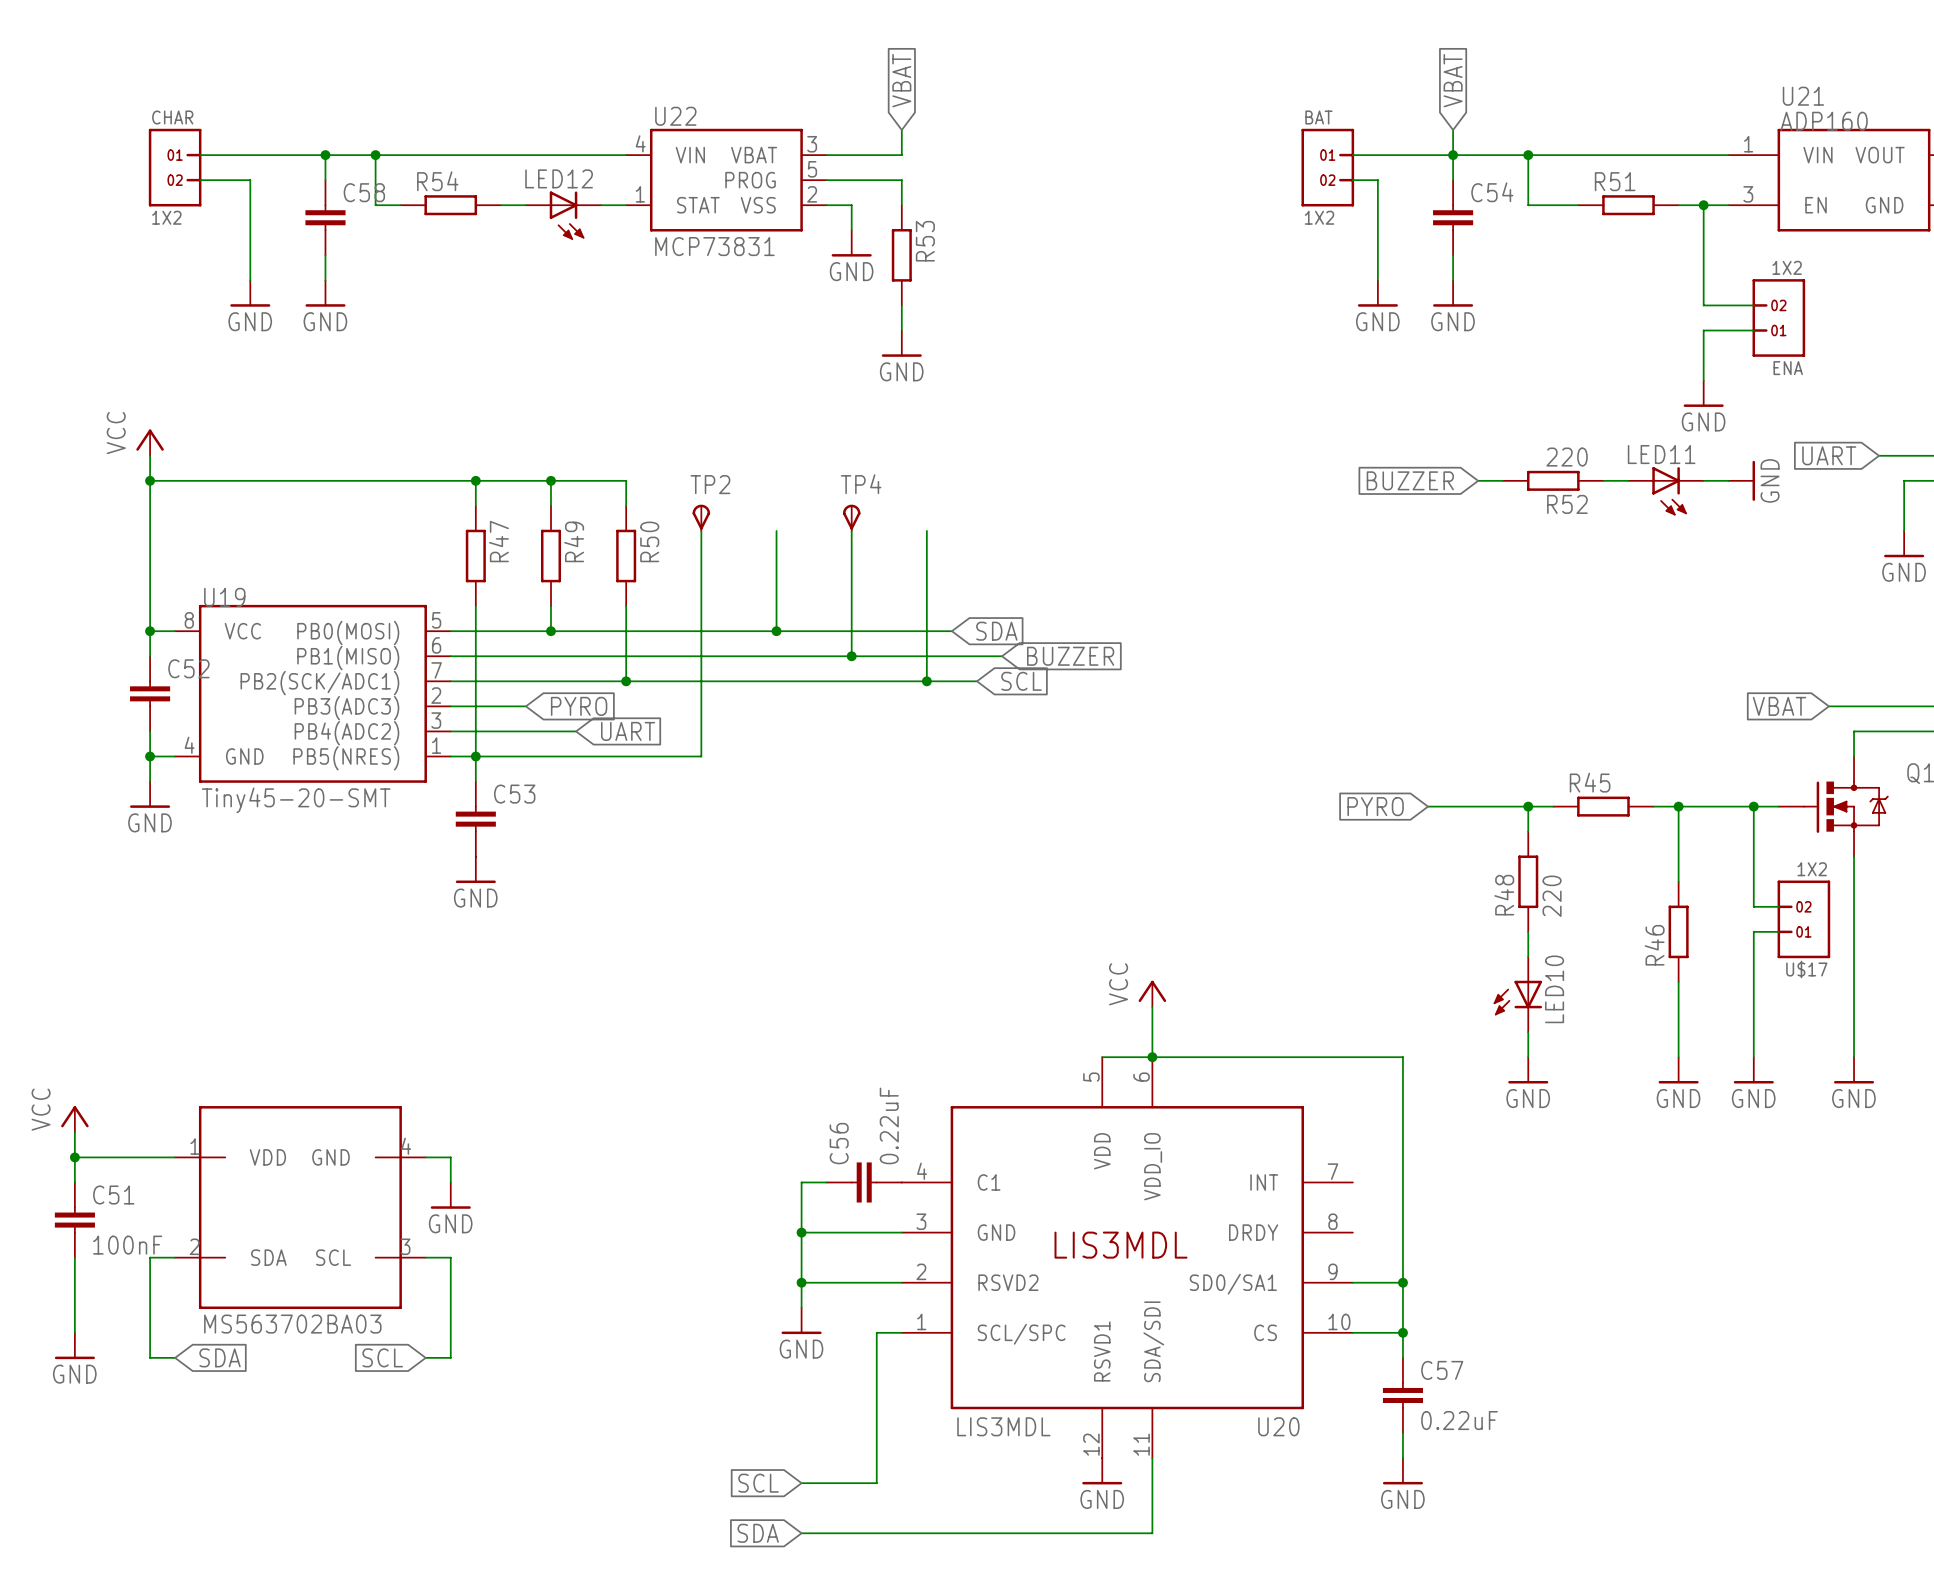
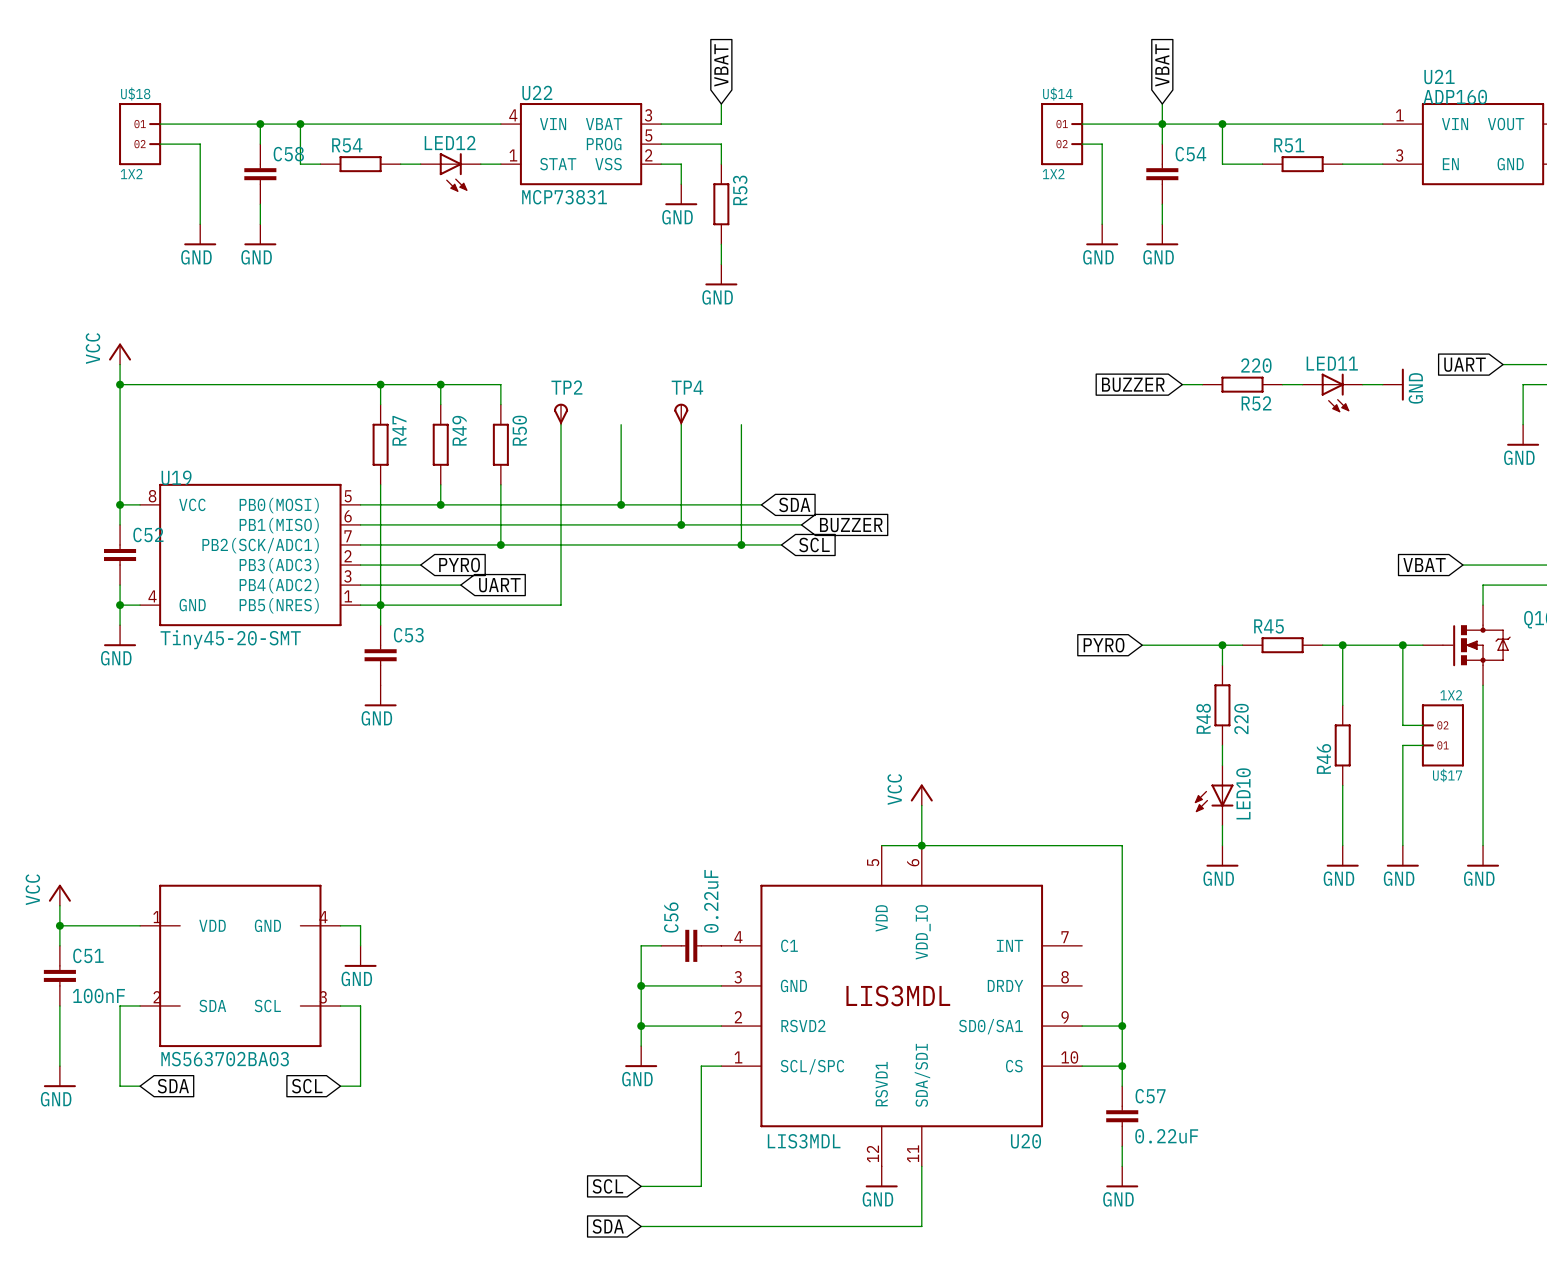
CHAR name: CHAR (172, 117) -> U$18 (135, 93)
BAT name: BAT (1318, 117) -> U$14 (1057, 93)
wire: (1703, 205) (1703, 305) (1753, 305) -> none
junction: (1703, 205) -> none
ENA: 1X2 (1778, 317) -> none
wire: (1753, 330) (1703, 330) (1703, 380) -> none
power symbol: GND (1703, 393) -> none

